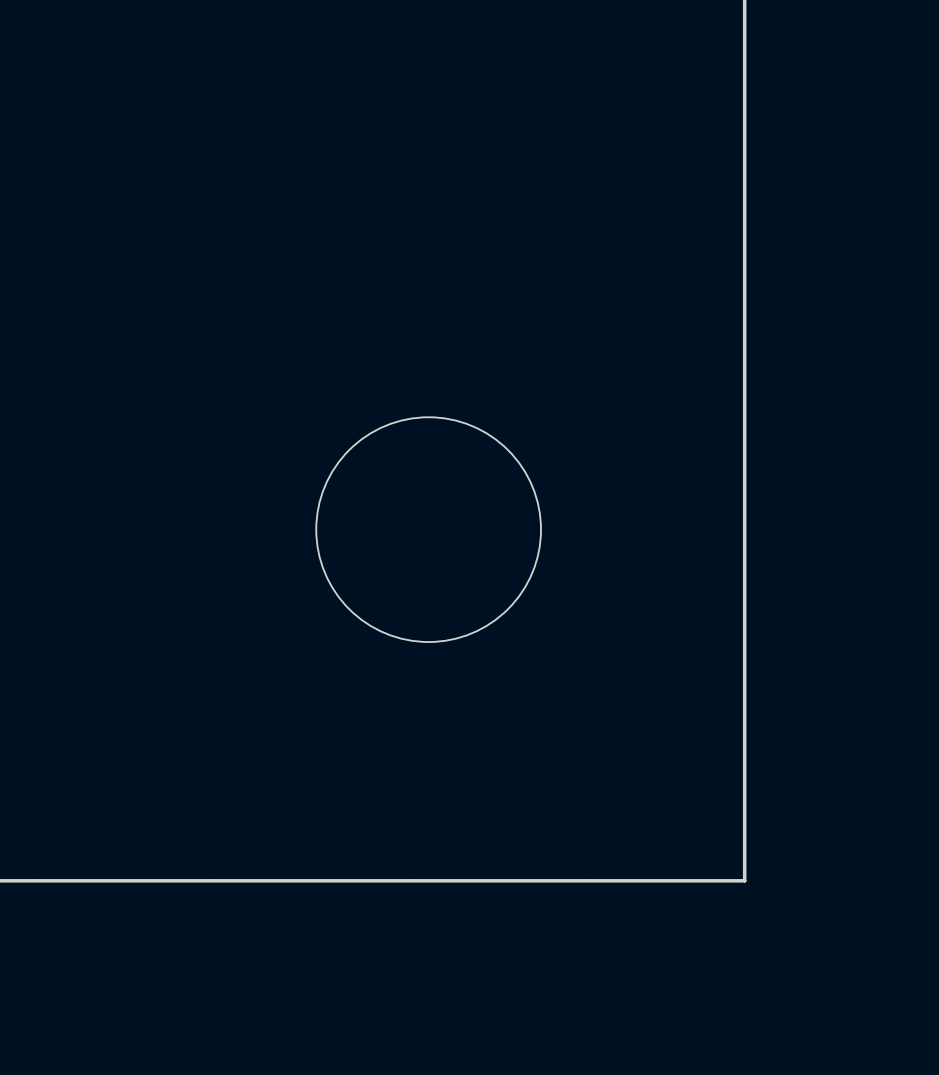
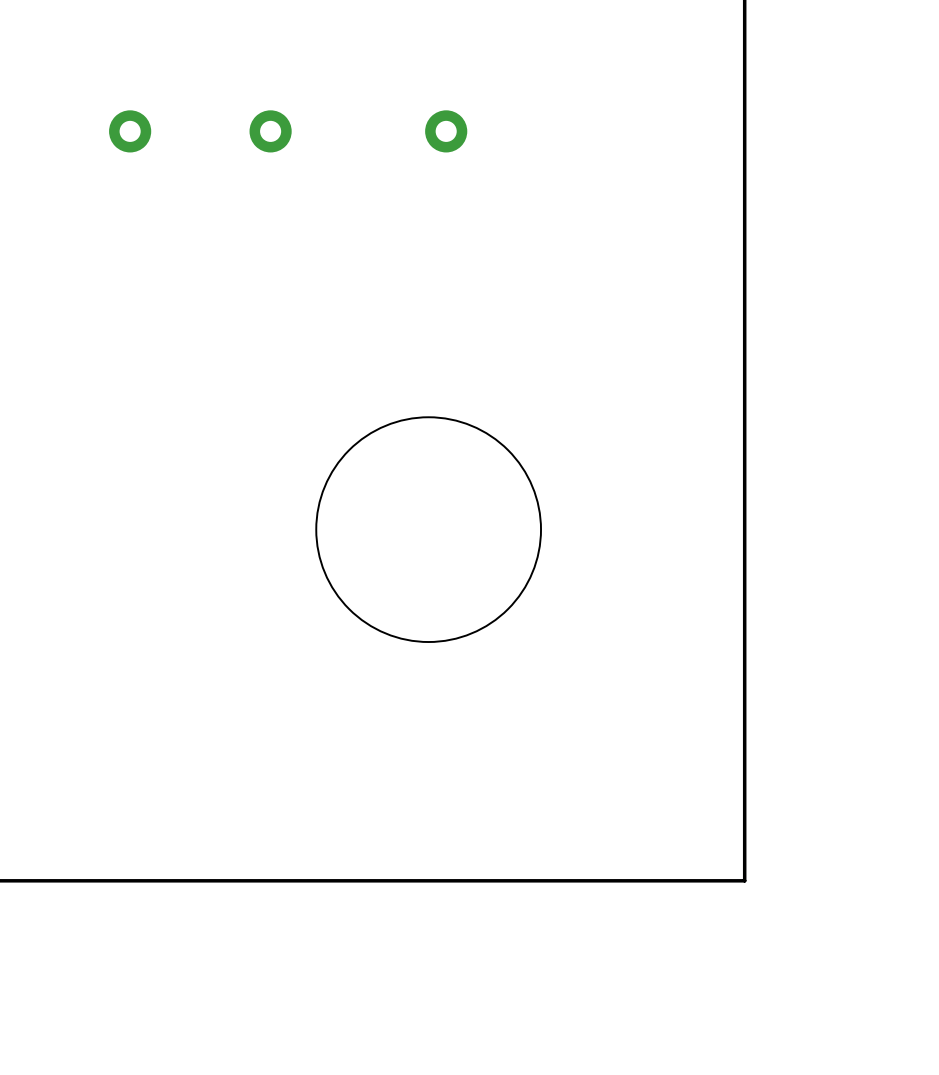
via: none -> (130, 131)
via: none -> (270, 131)
via: none -> (446, 131)

